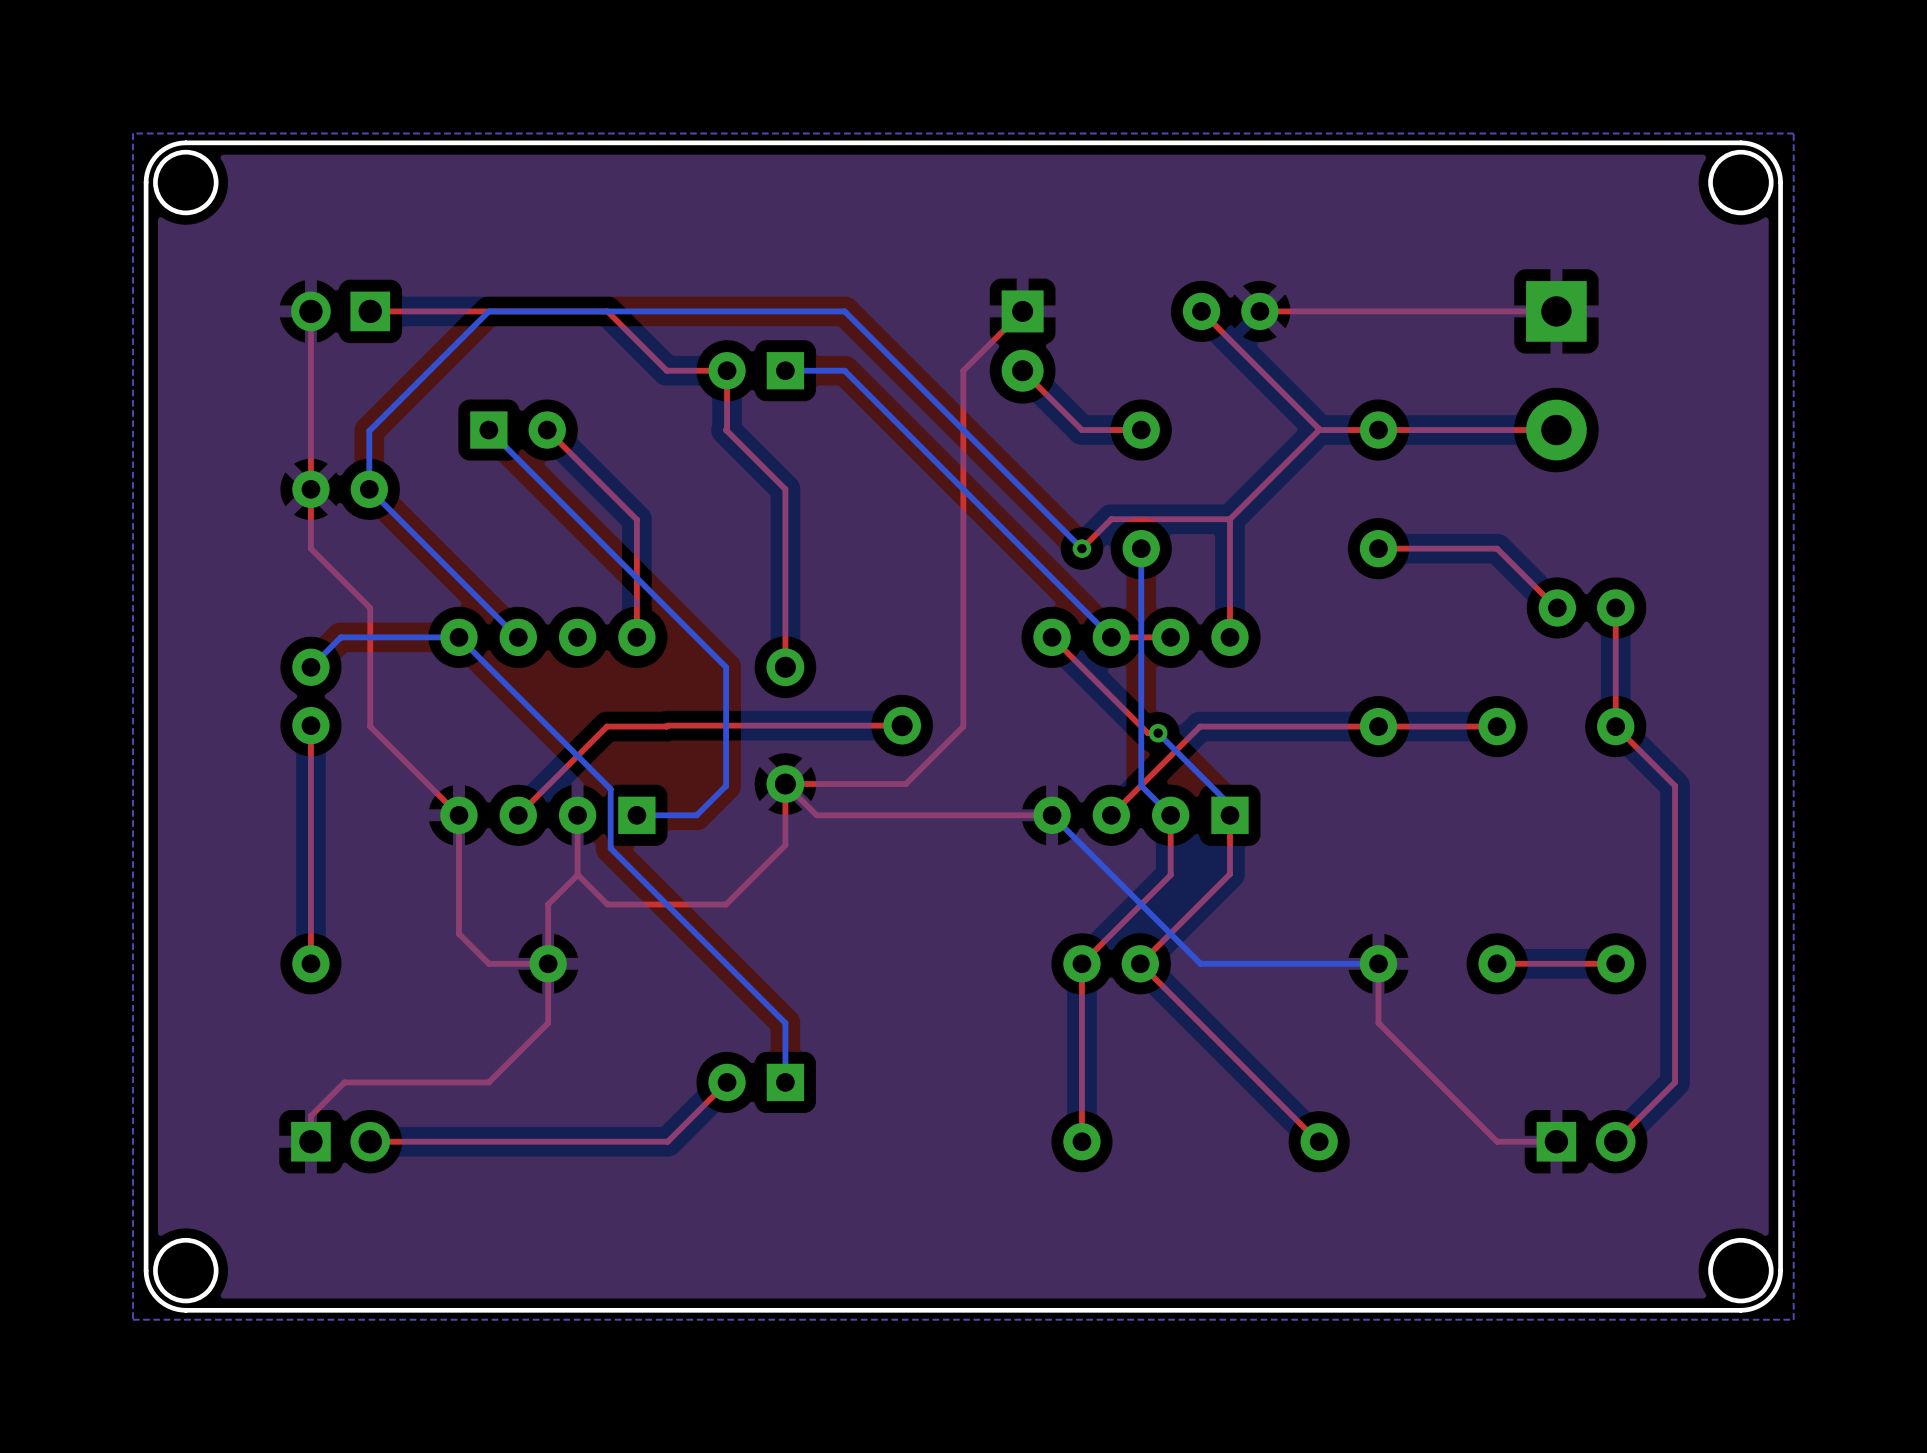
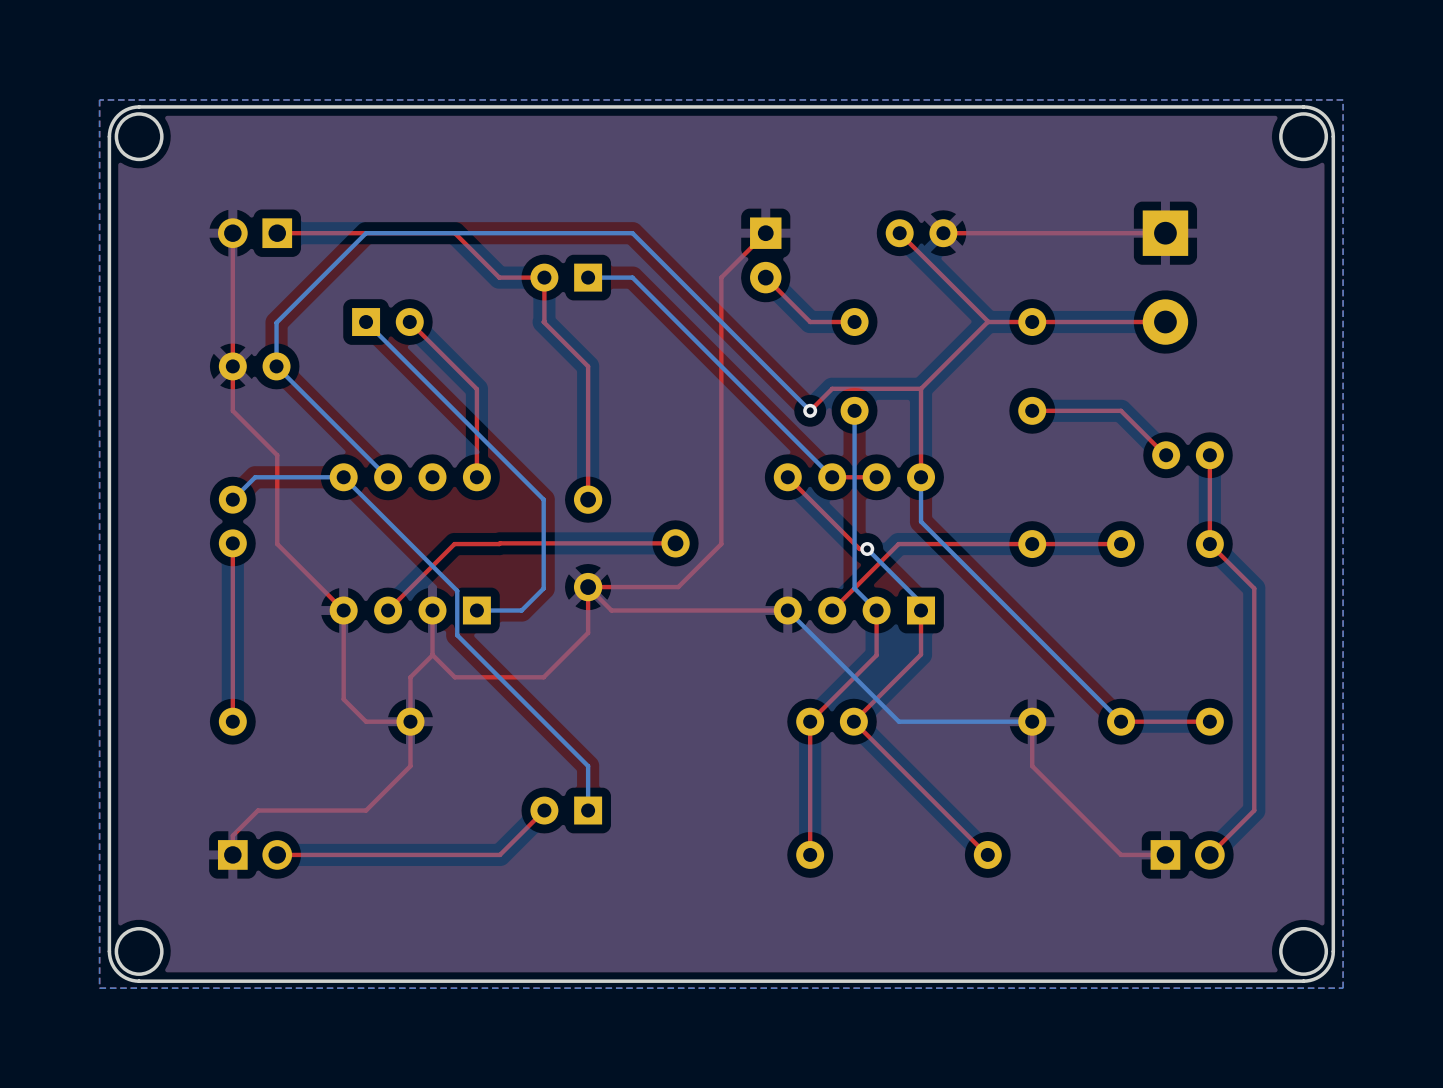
bottom track: none -> (921, 477) (921, 521) (1121, 721)

